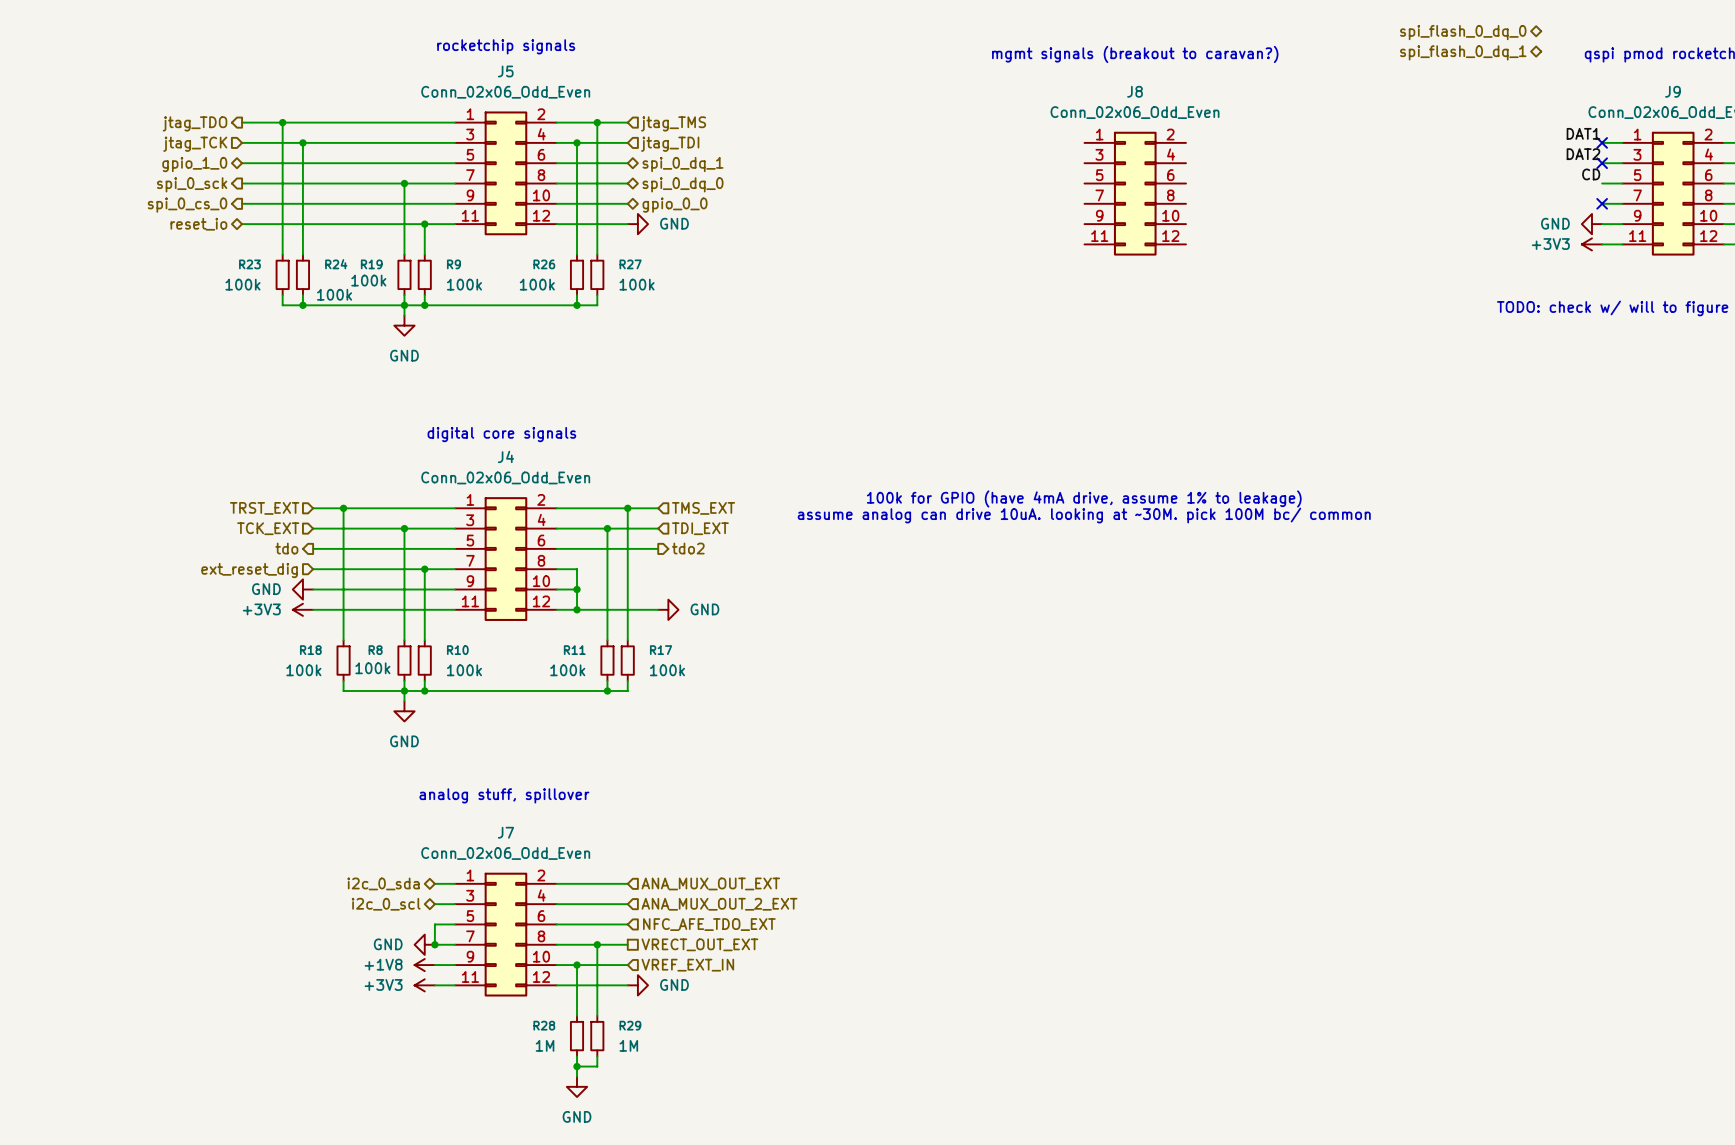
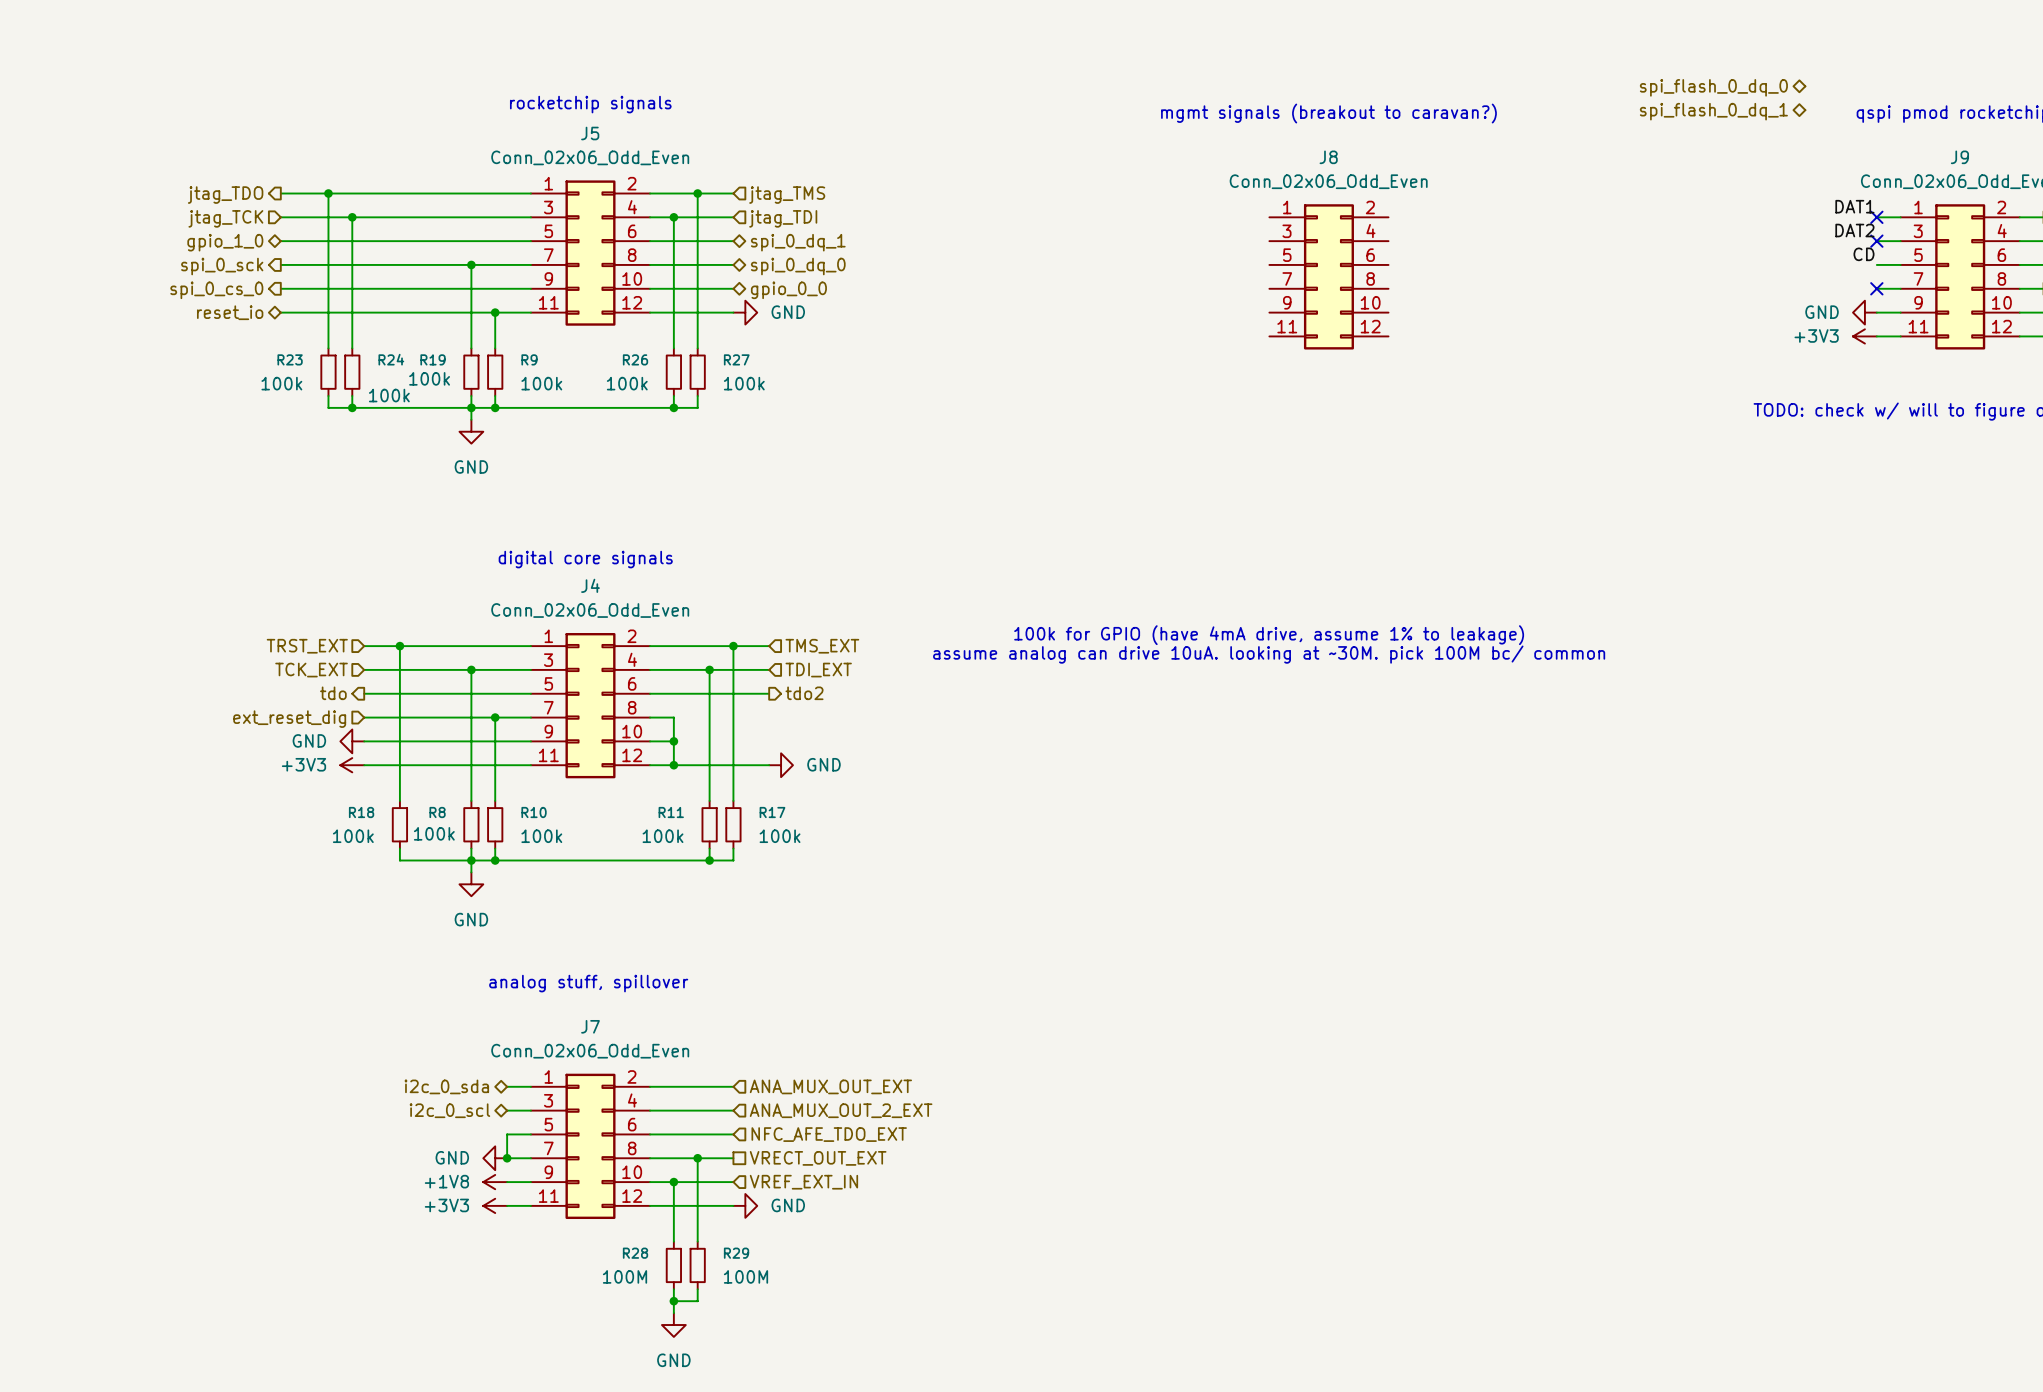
R28 value: 1M (545, 1045) -> 100M (625, 1276)
R29 value: 1M (628, 1045) -> 100M (745, 1276)

